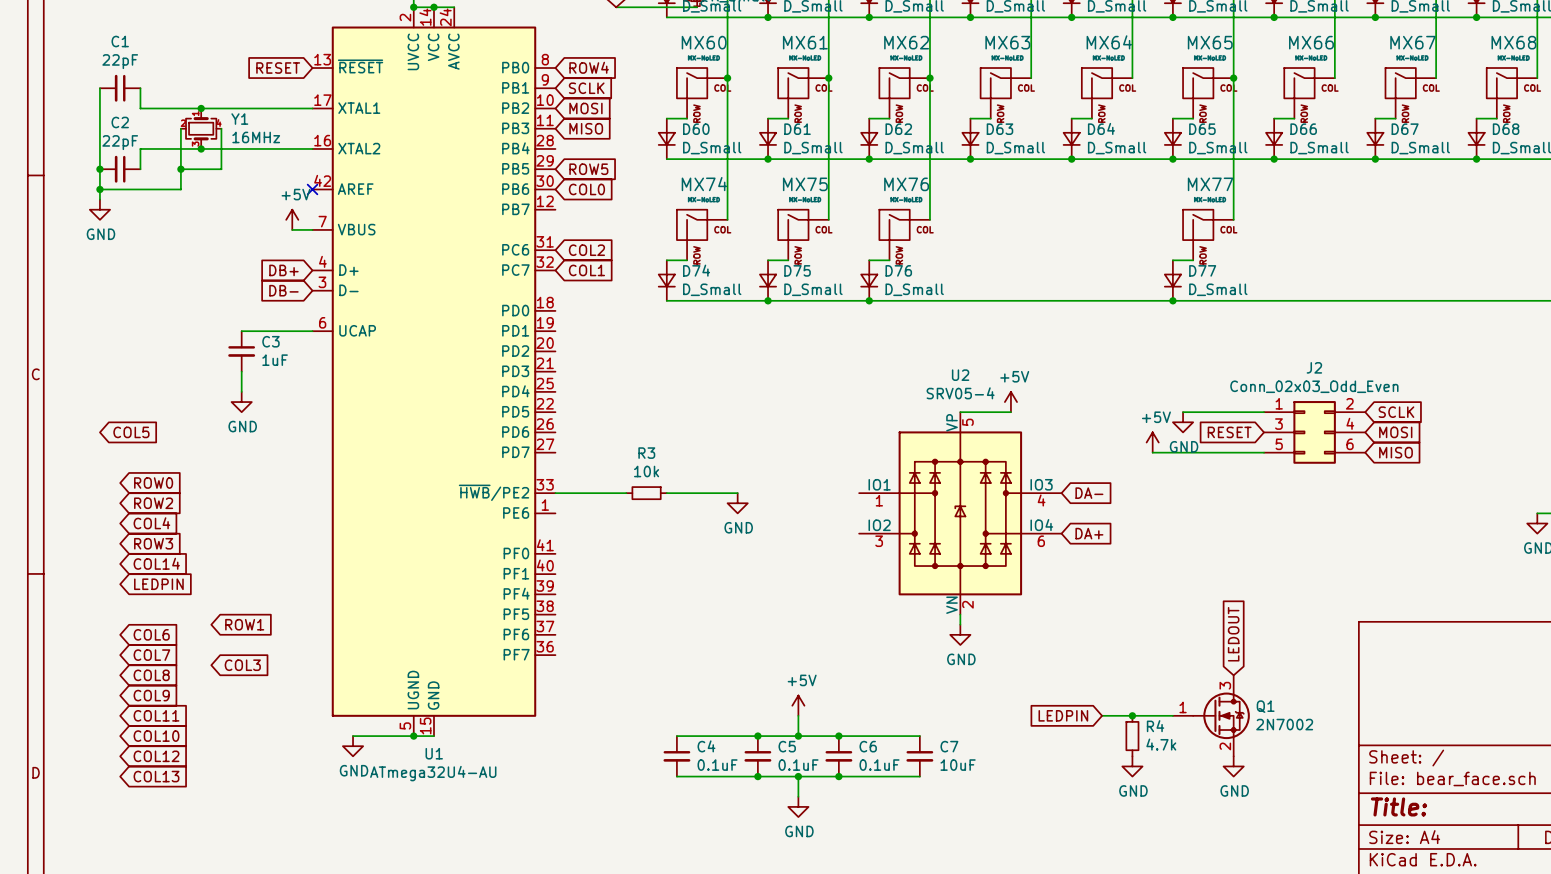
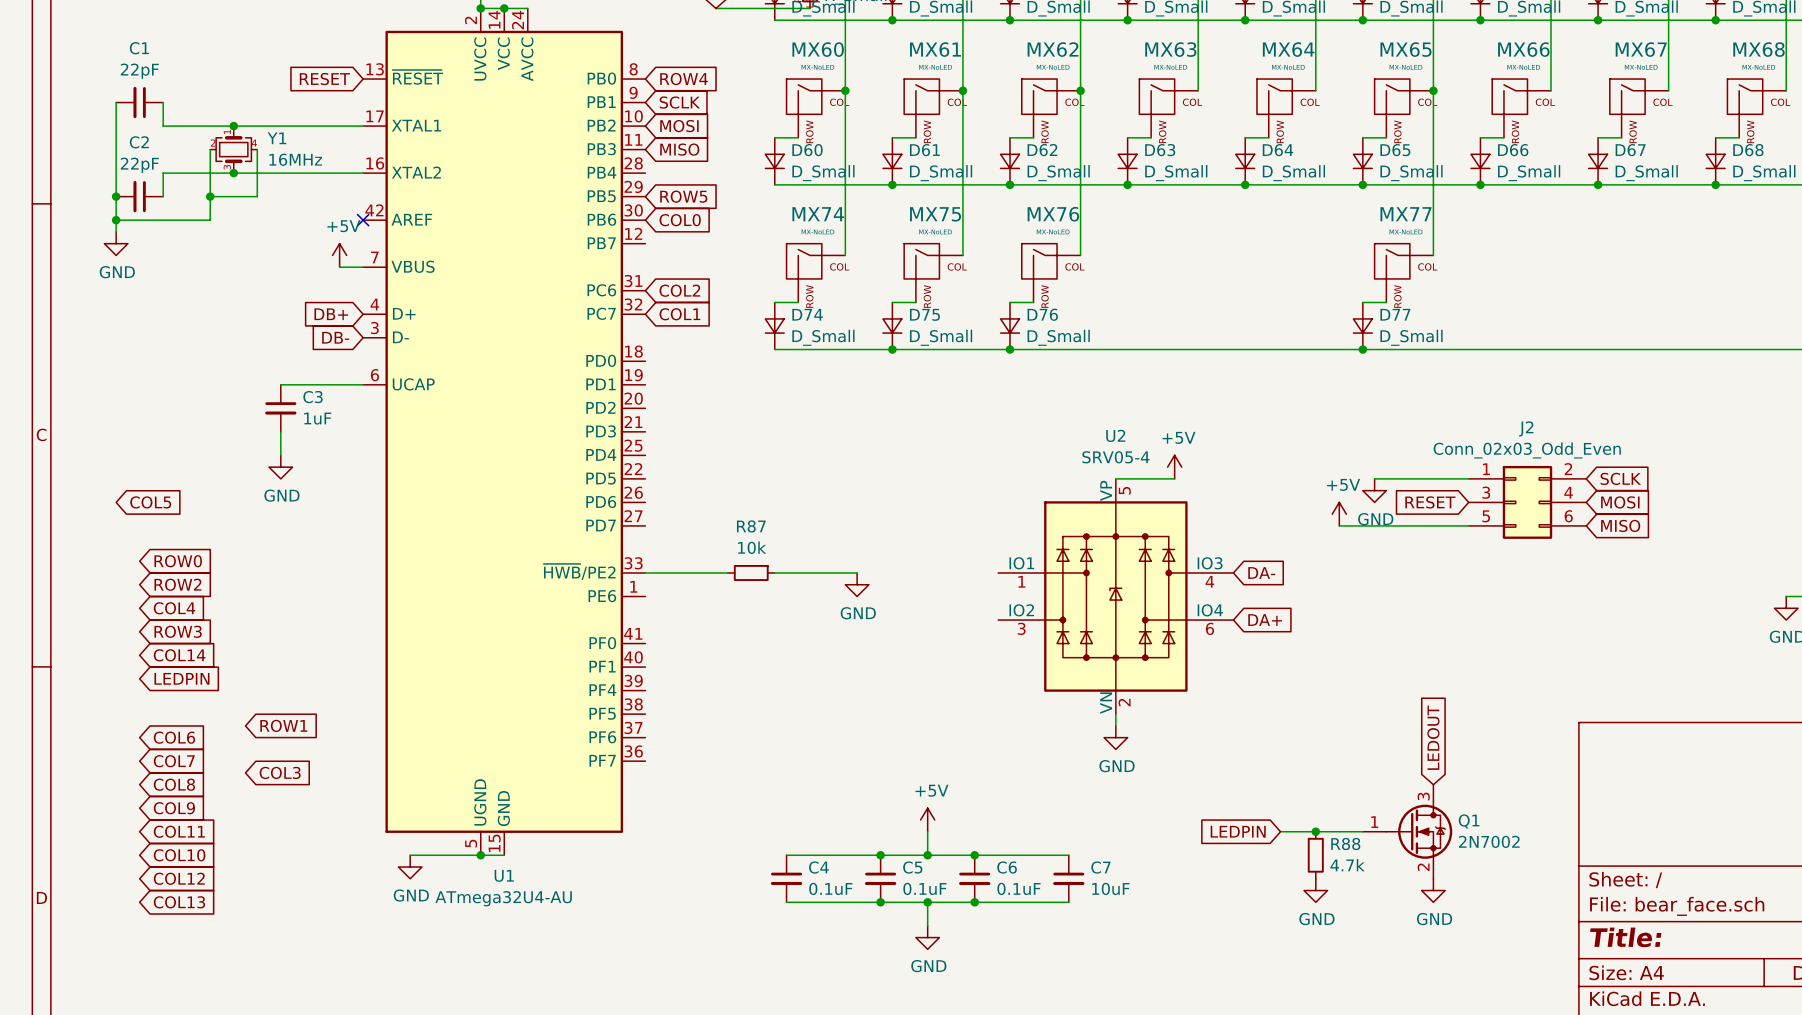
R3 name: R3 (646, 453) -> R87 (751, 526)
R4 name: R4 (1155, 726) -> R88 (1345, 844)

